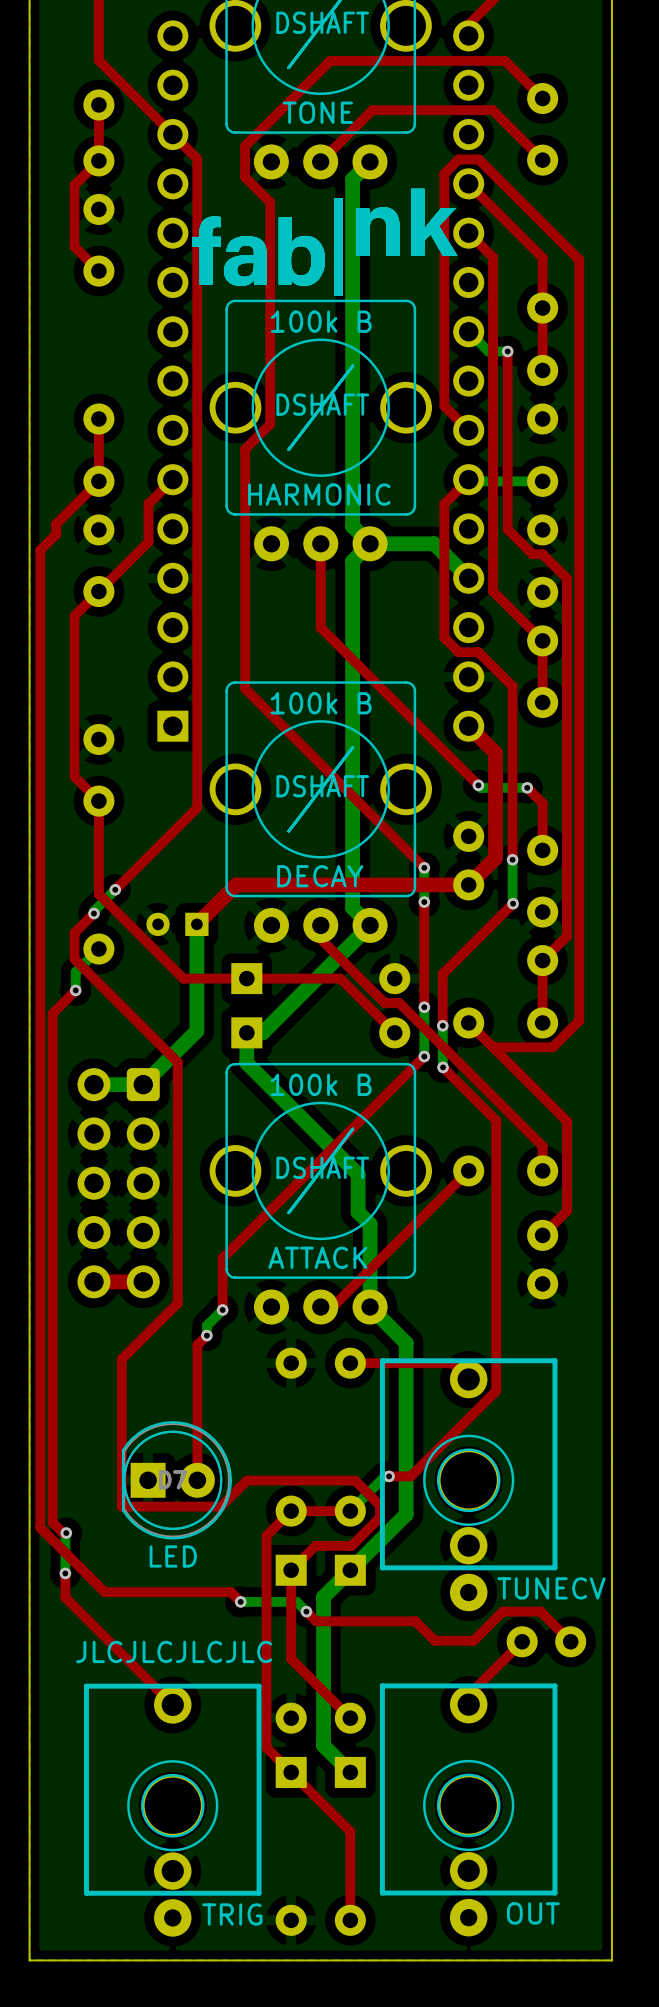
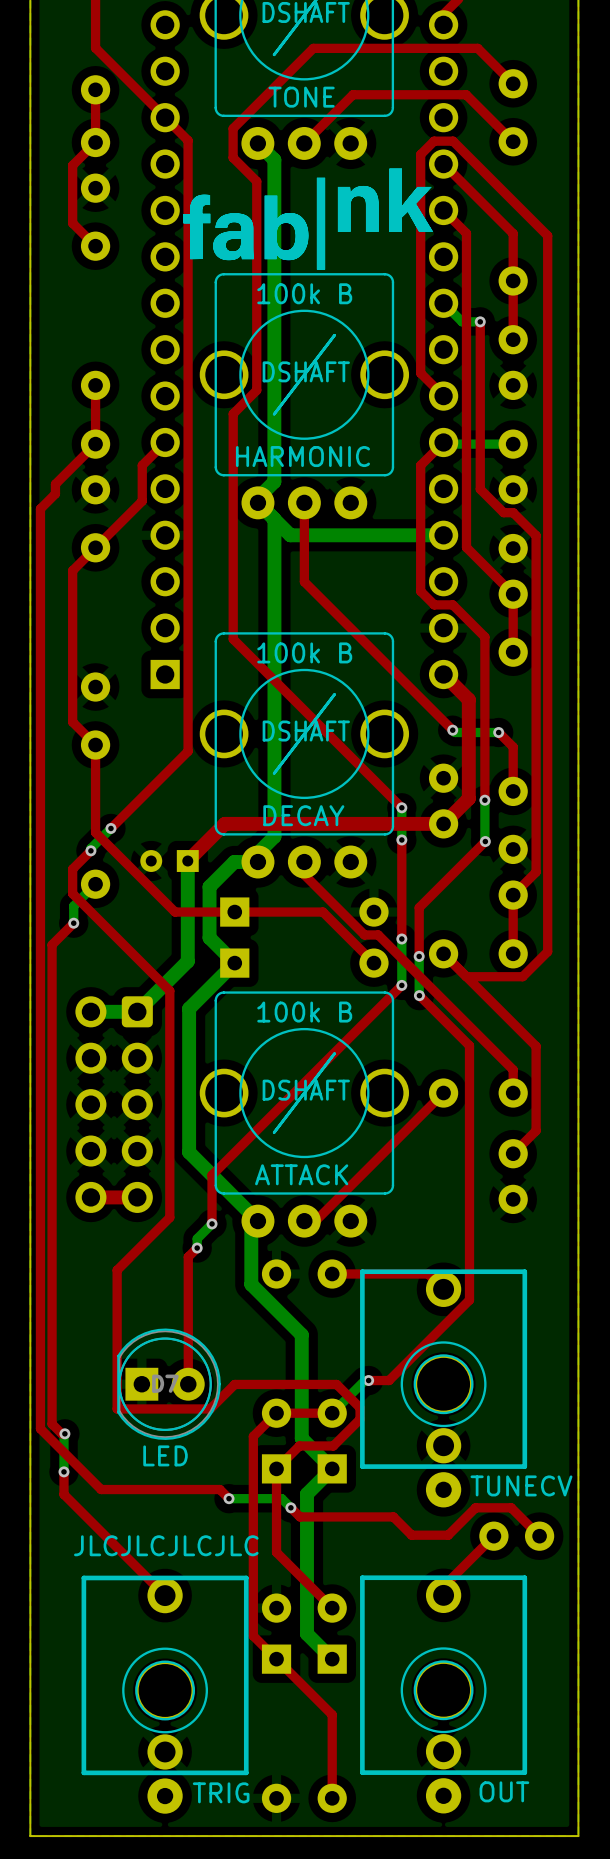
bottom track: (369, 161) (352, 179) (352, 526) (370, 543) -> none
bottom track: (370, 543) (352, 561) (352, 907) (370, 925) (262, 1032) (246, 1032) (246, 1063) (358, 1174) (358, 1212) (370, 1224) (370, 1307) (406, 1343) (406, 1514) (350, 1570) -> (274, 519) (274, 836) (257, 853) (257, 862) (234, 862) (209, 886) (209, 937) (234, 963) (189, 1008) (189, 1152) (257, 1221) (251, 1227) (251, 1284) (301, 1334) (301, 1438) (332, 1468)
bottom track: (370, 543) (434, 543) (468, 578) -> (257, 143) (274, 159) (274, 481) (257, 498) (257, 502) (290, 535) (443, 535)

